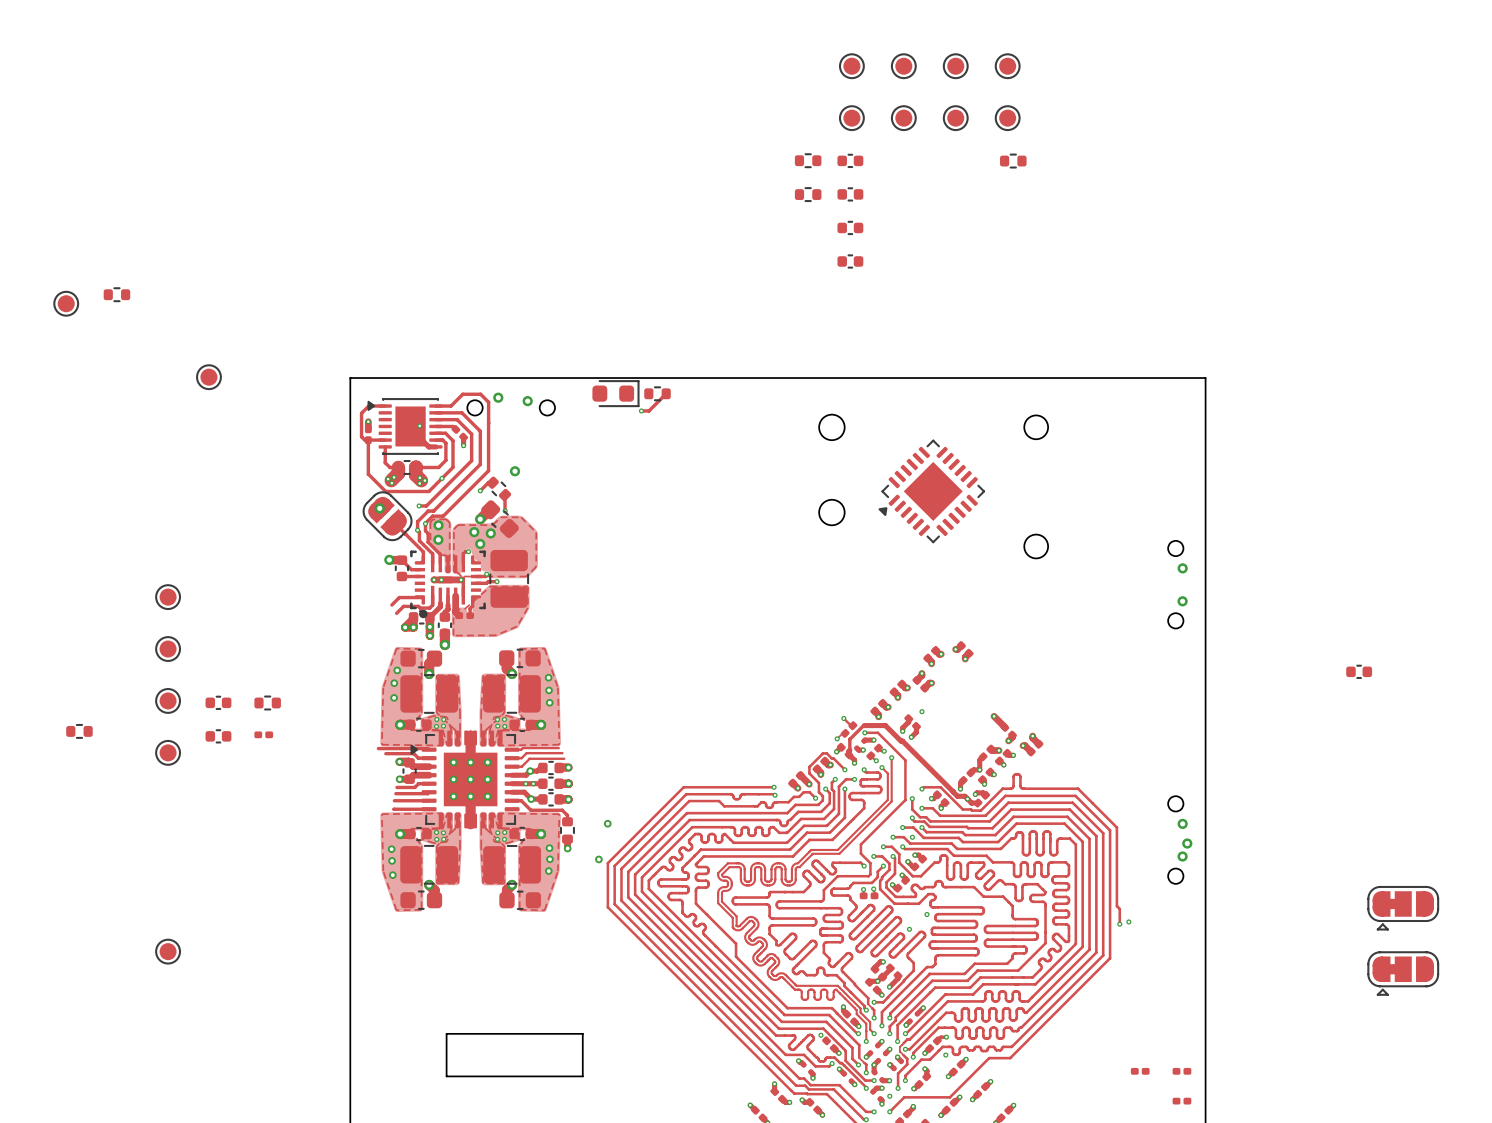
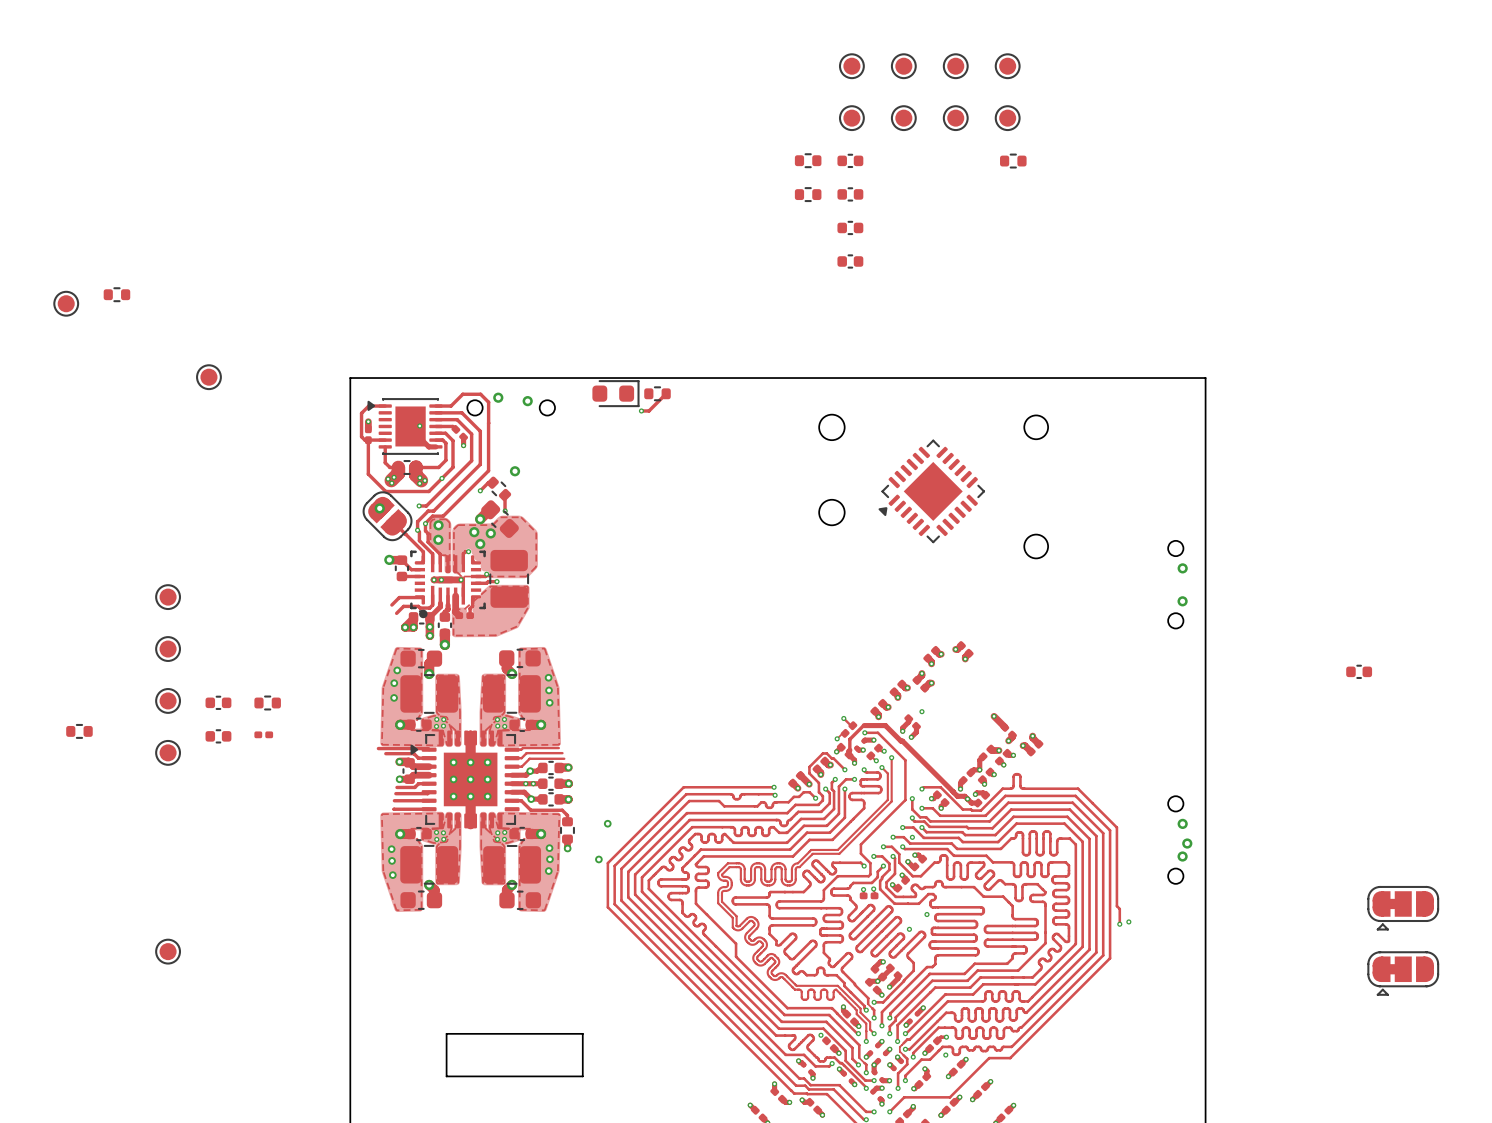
part: (1140, 1071) -> none
part: (1181, 1071) -> none
part: (1181, 1101) -> none

